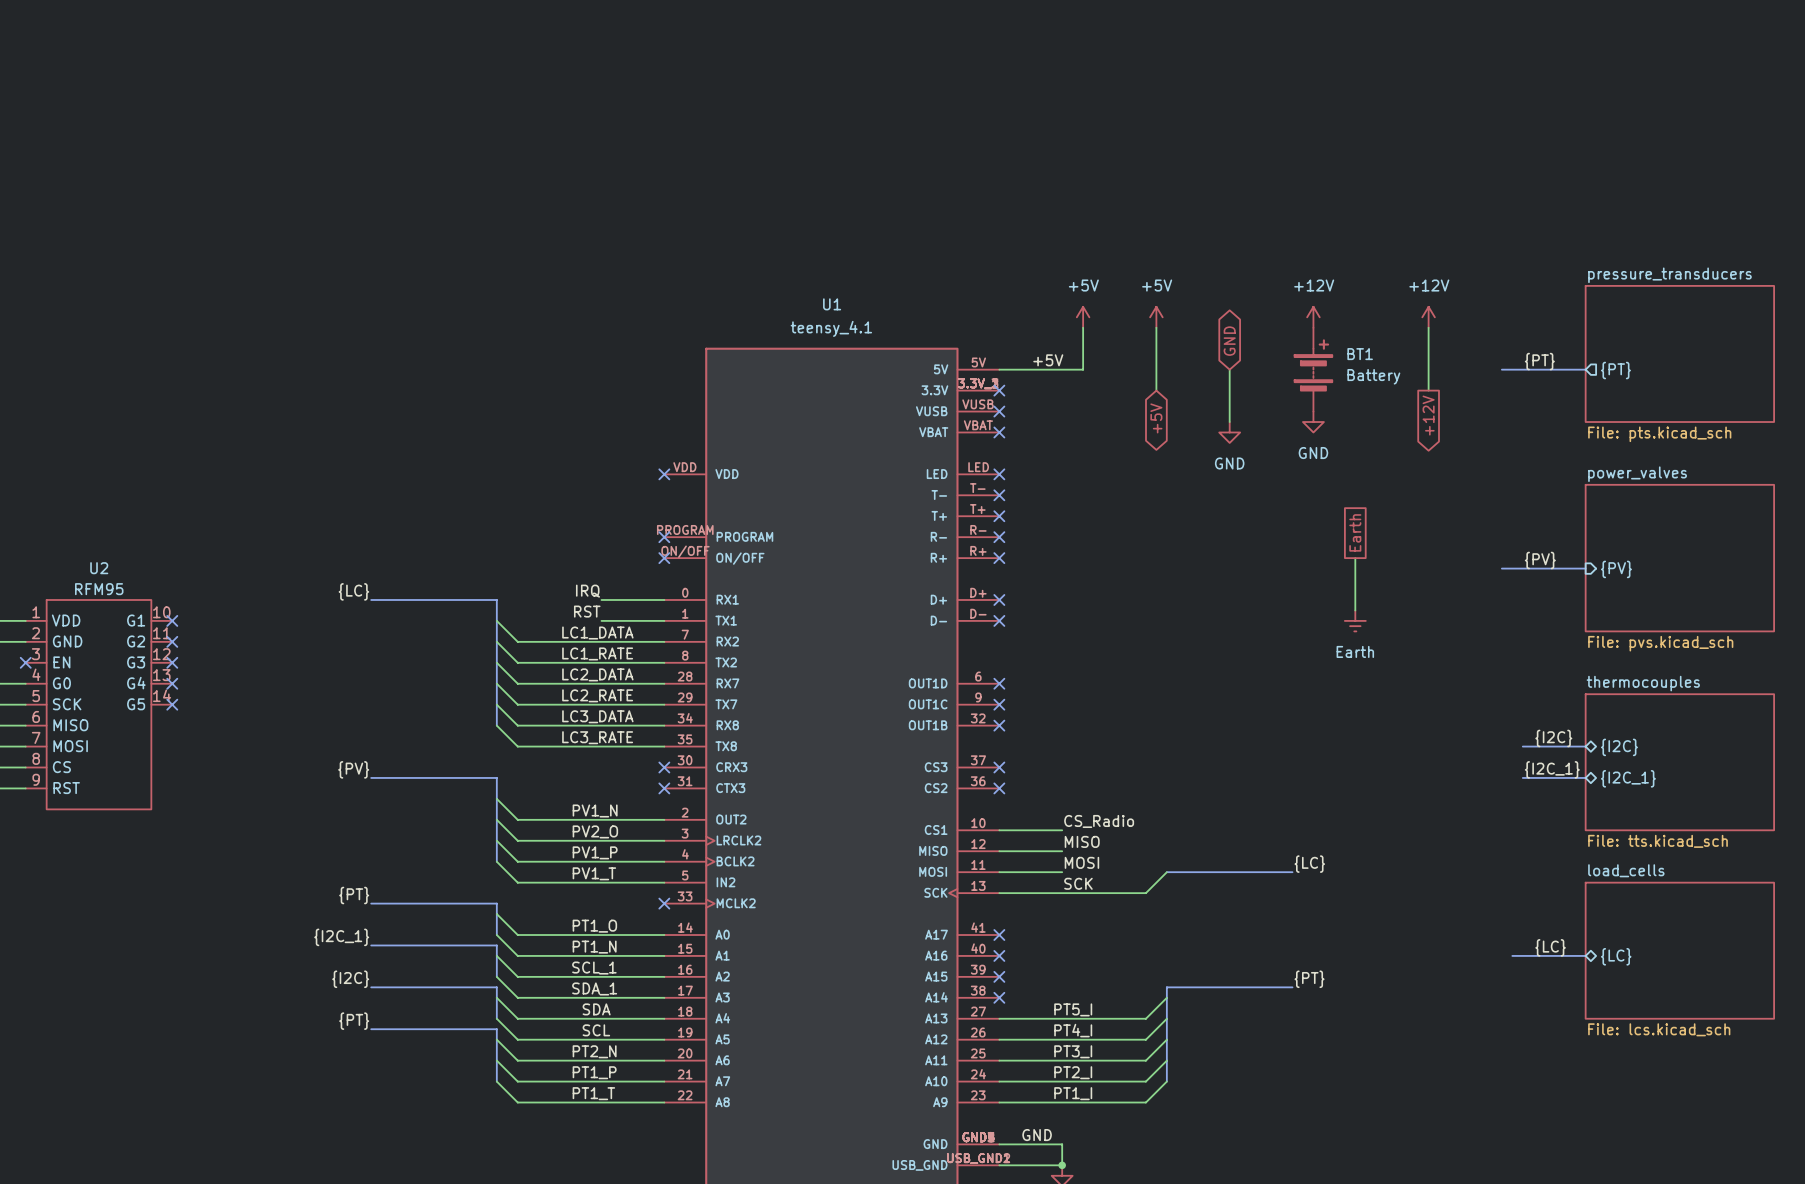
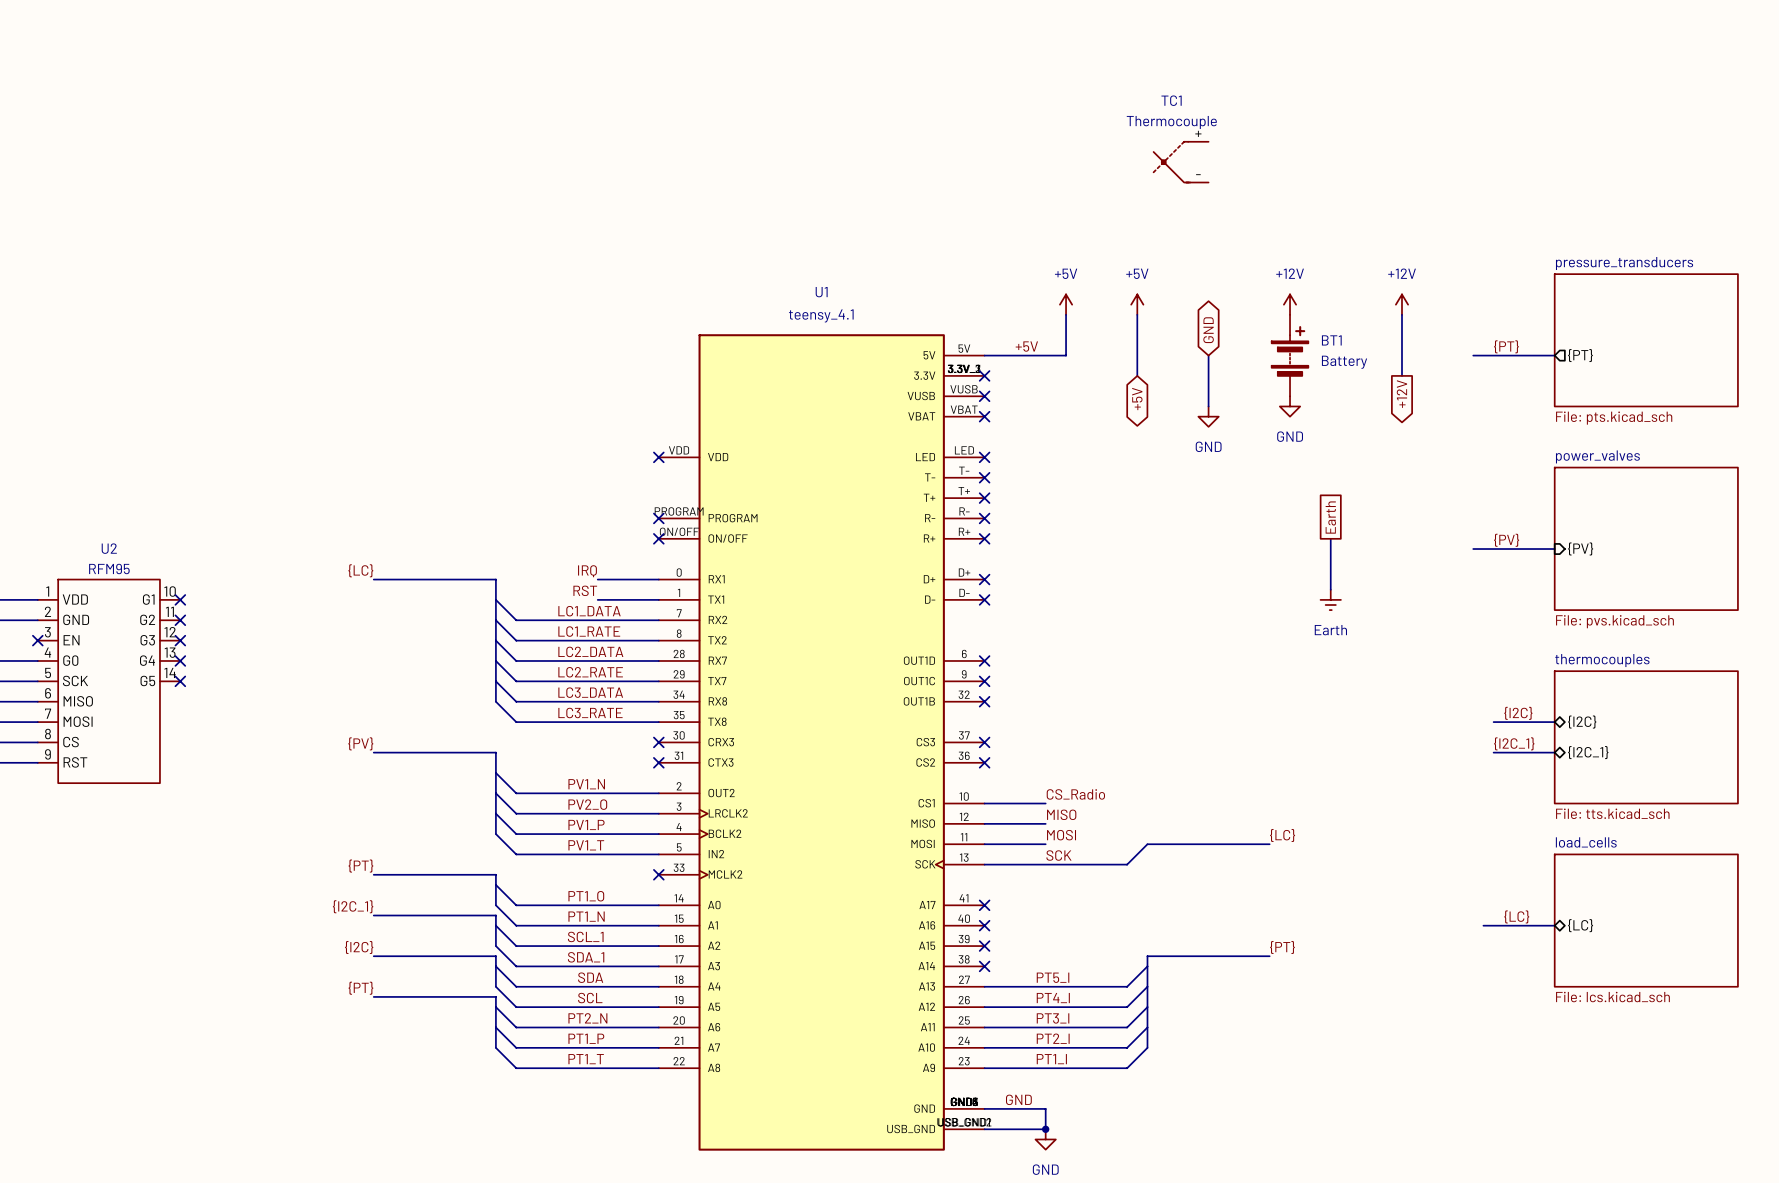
TC1: none -> Thermocouple (1181, 162)

